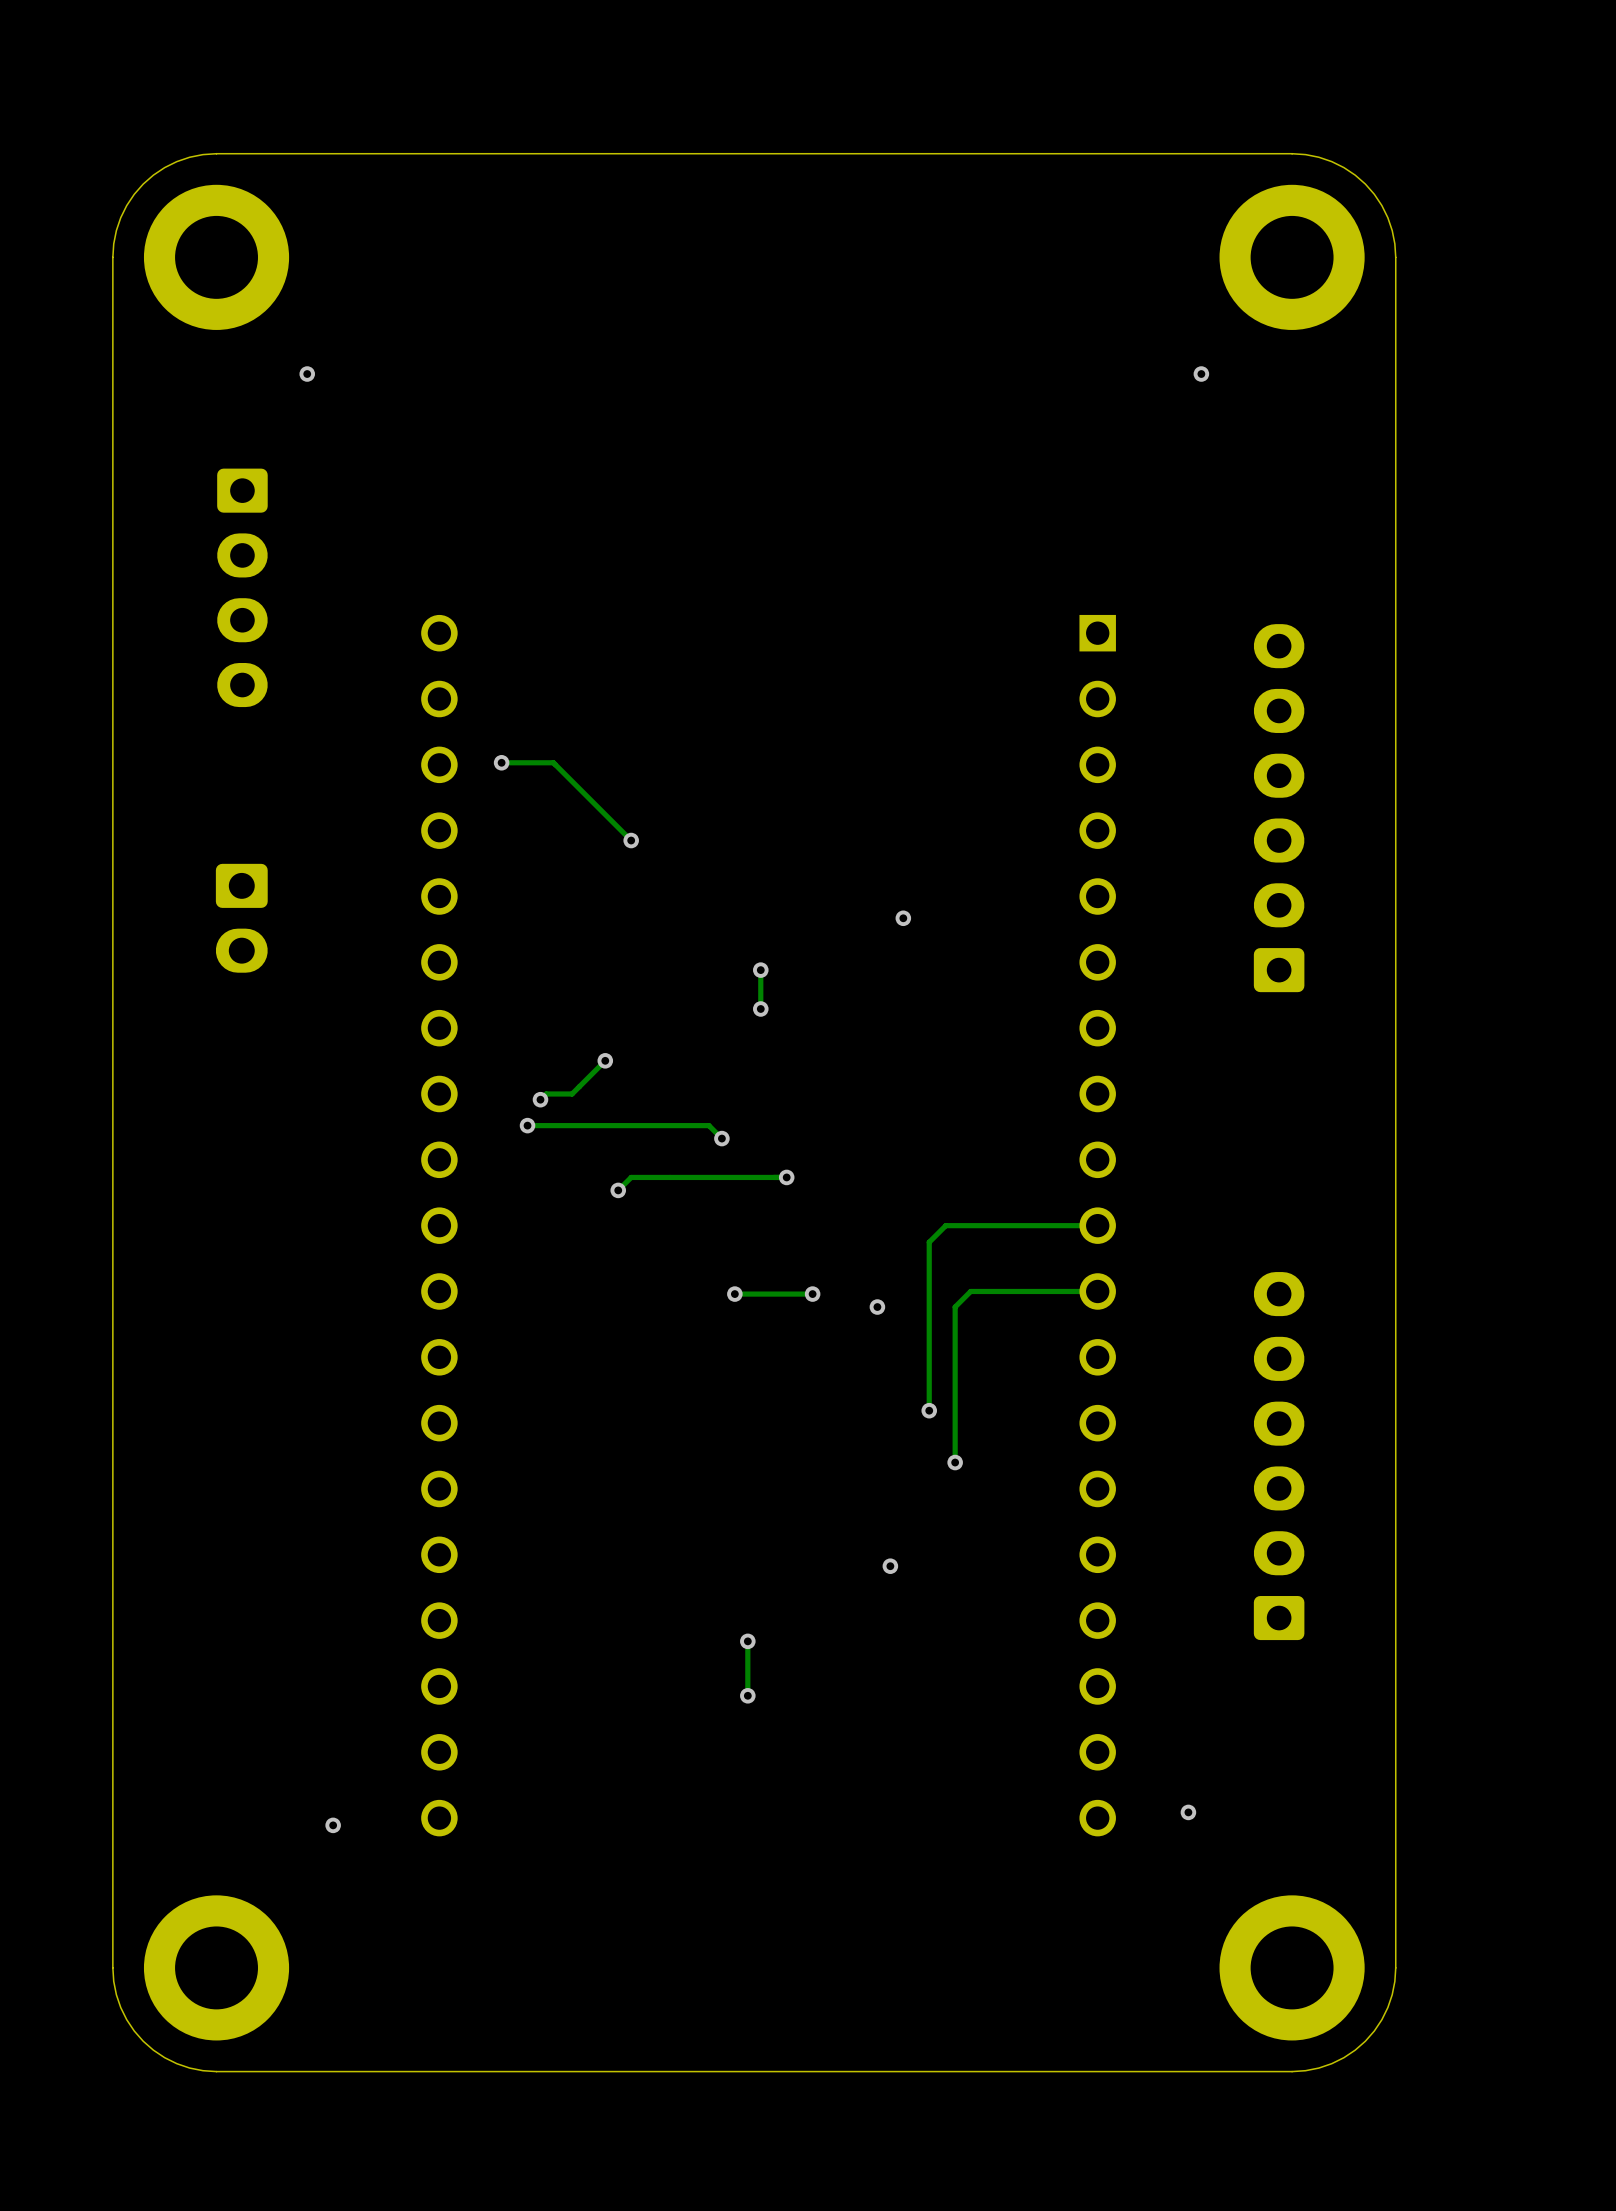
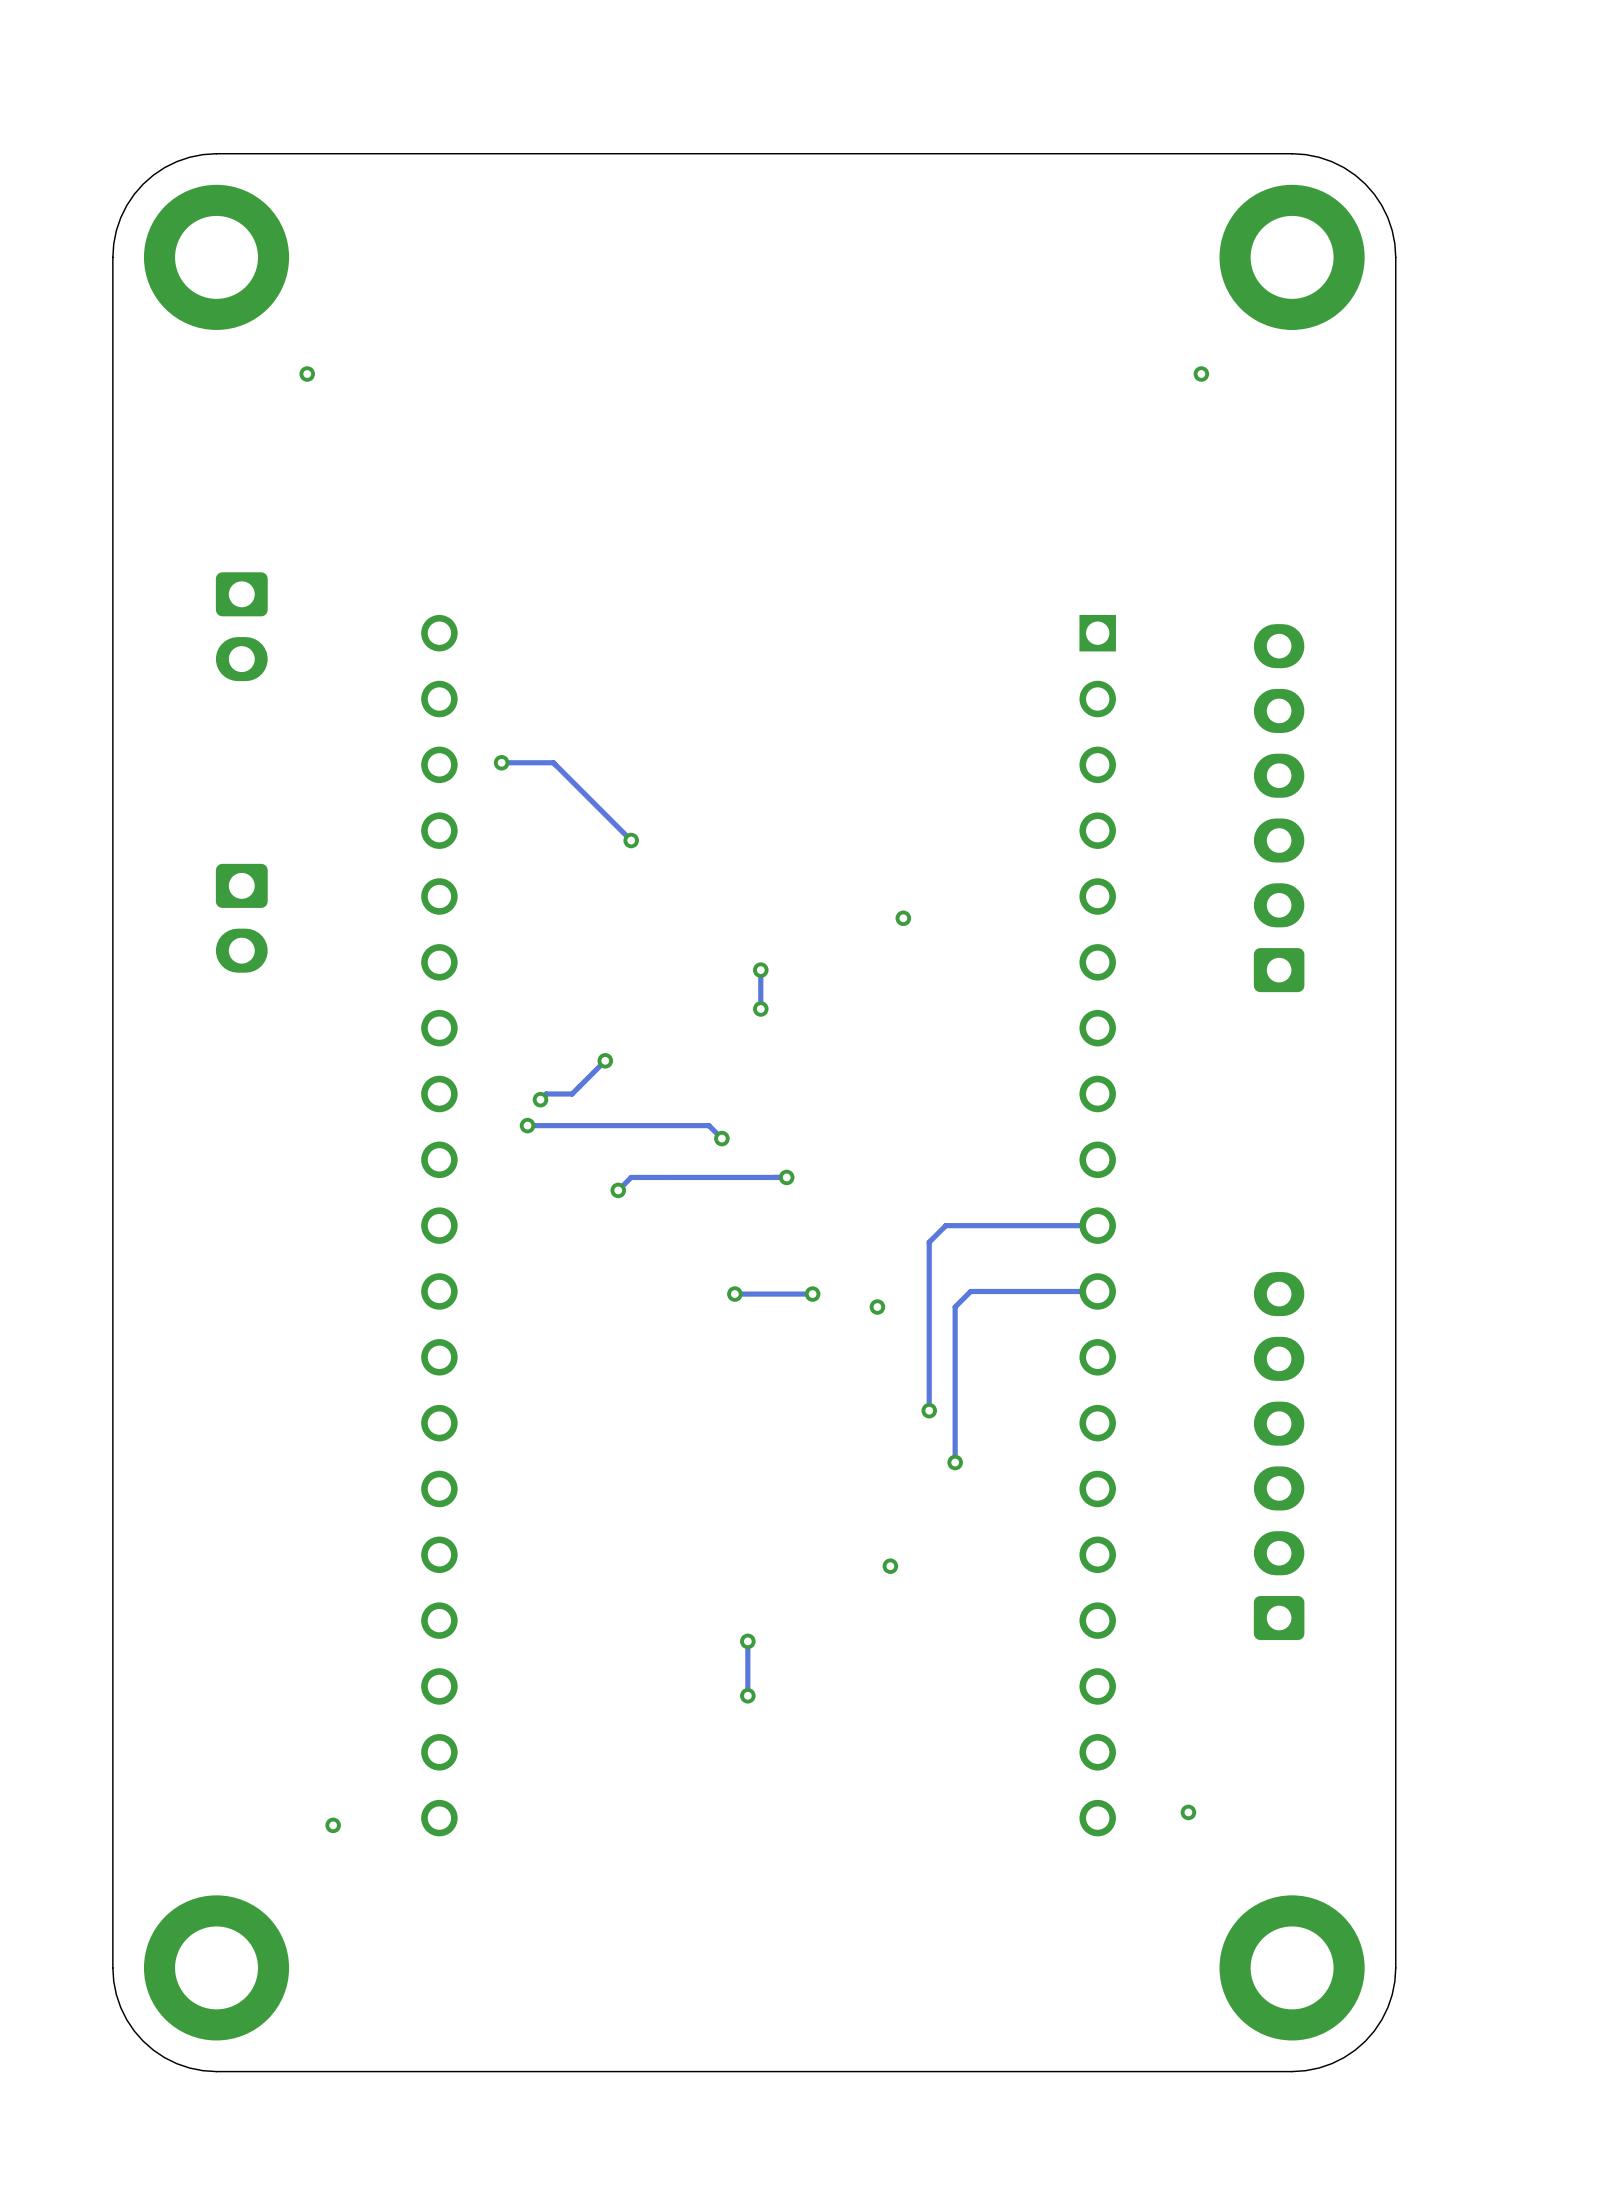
part: (242, 587) -> none
part: none -> (241, 626)

